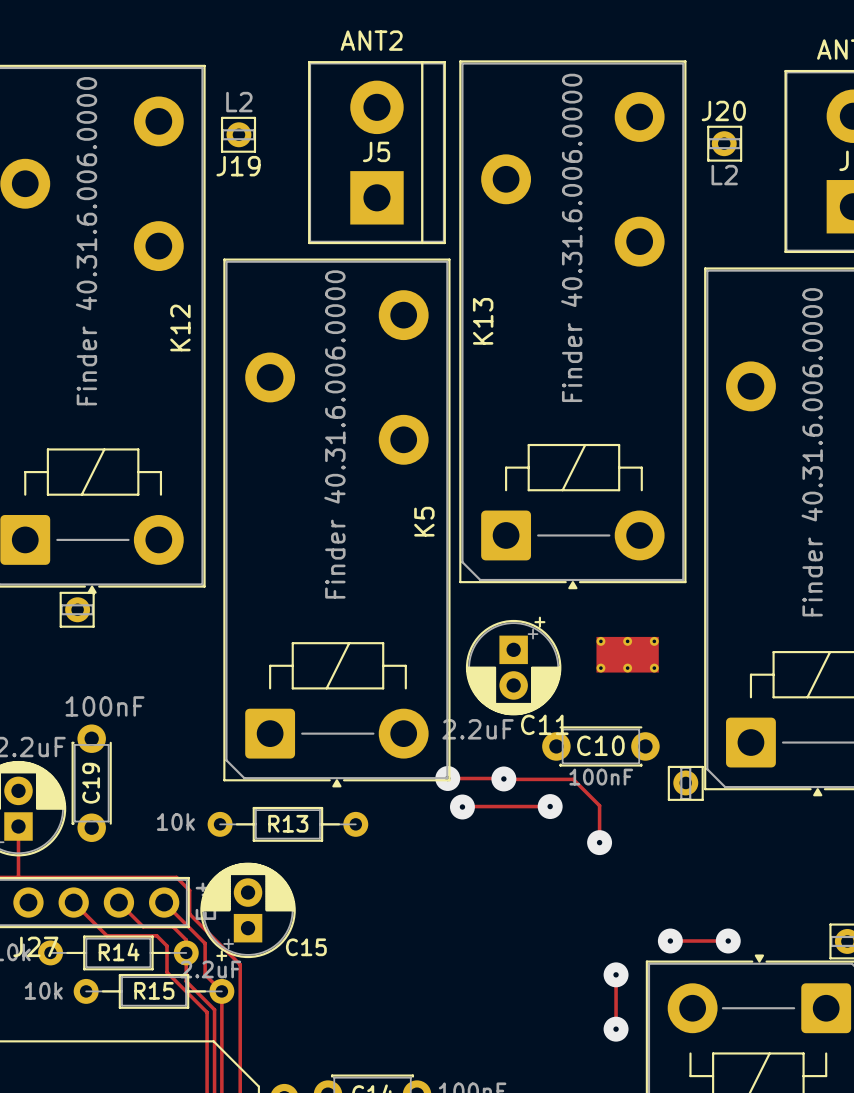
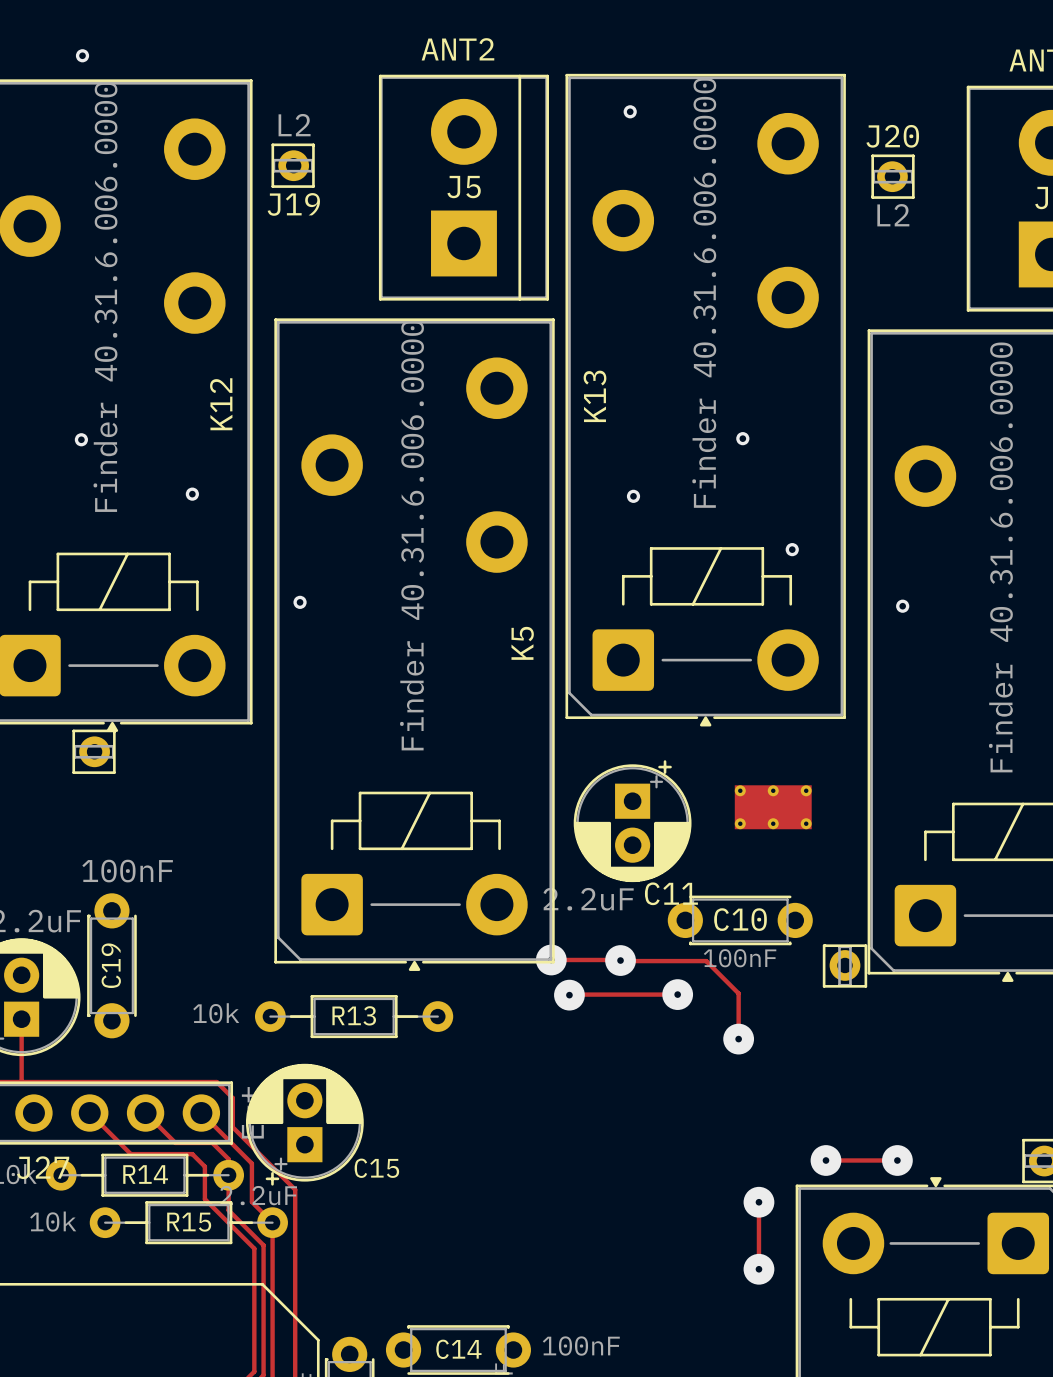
via: none -> (82, 55)
via: none -> (630, 111)
via: none -> (81, 439)
via: none -> (742, 438)
via: none -> (192, 494)
via: none -> (633, 496)
via: none -> (792, 549)
via: none -> (300, 602)
via: none -> (902, 606)

